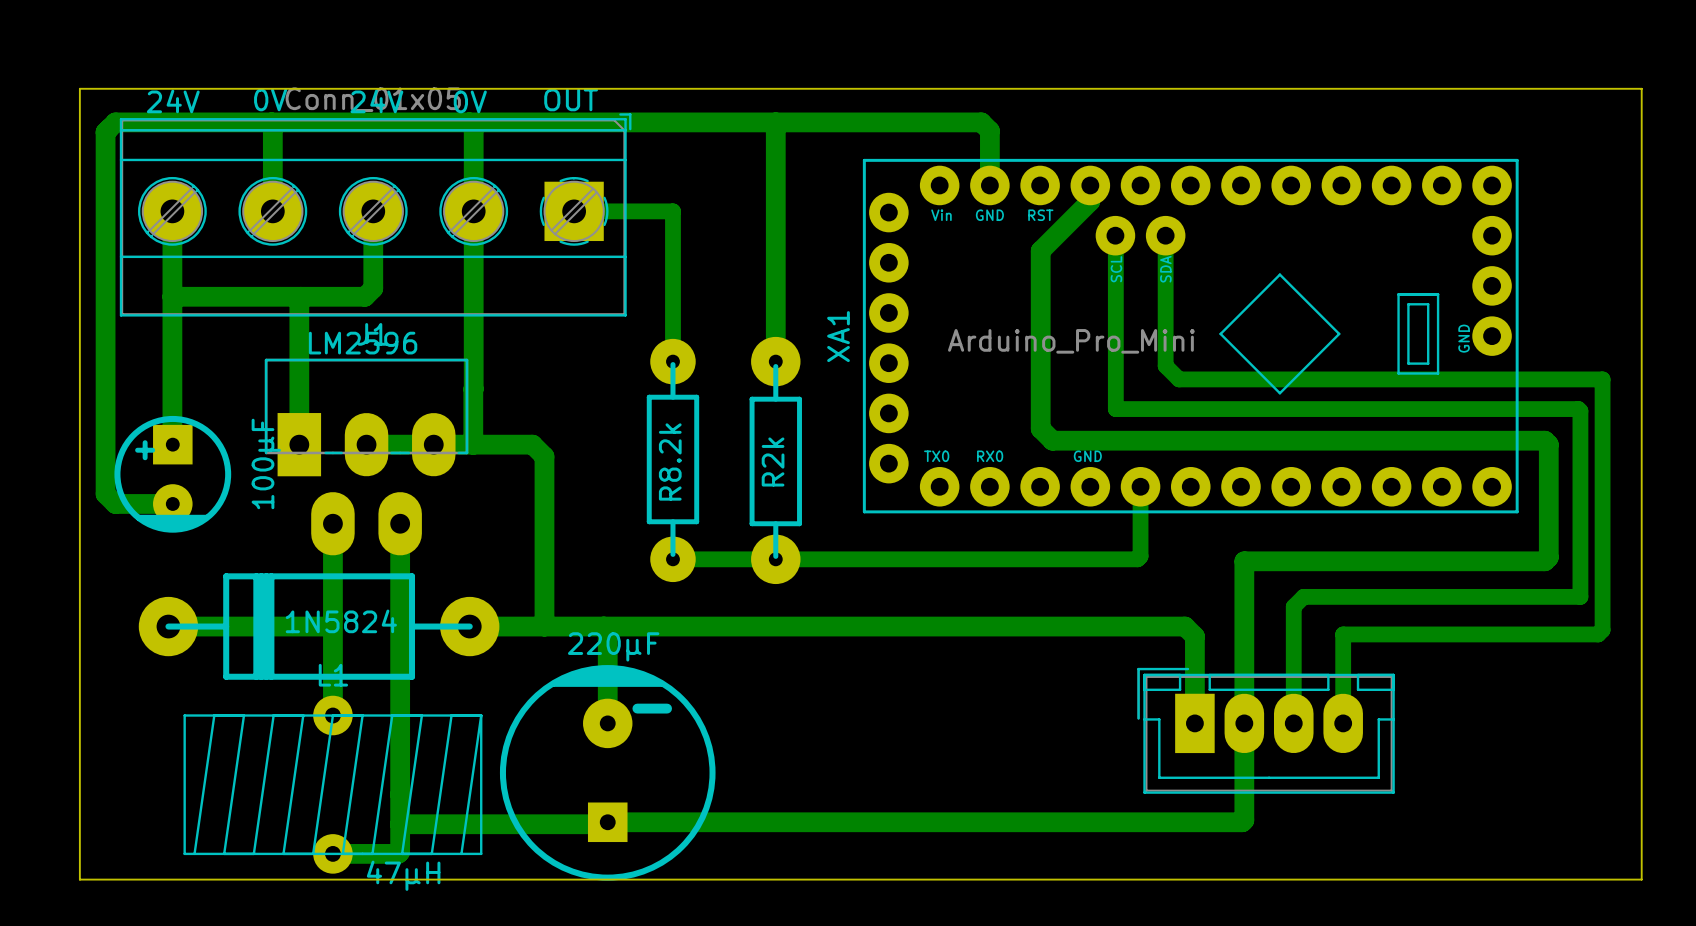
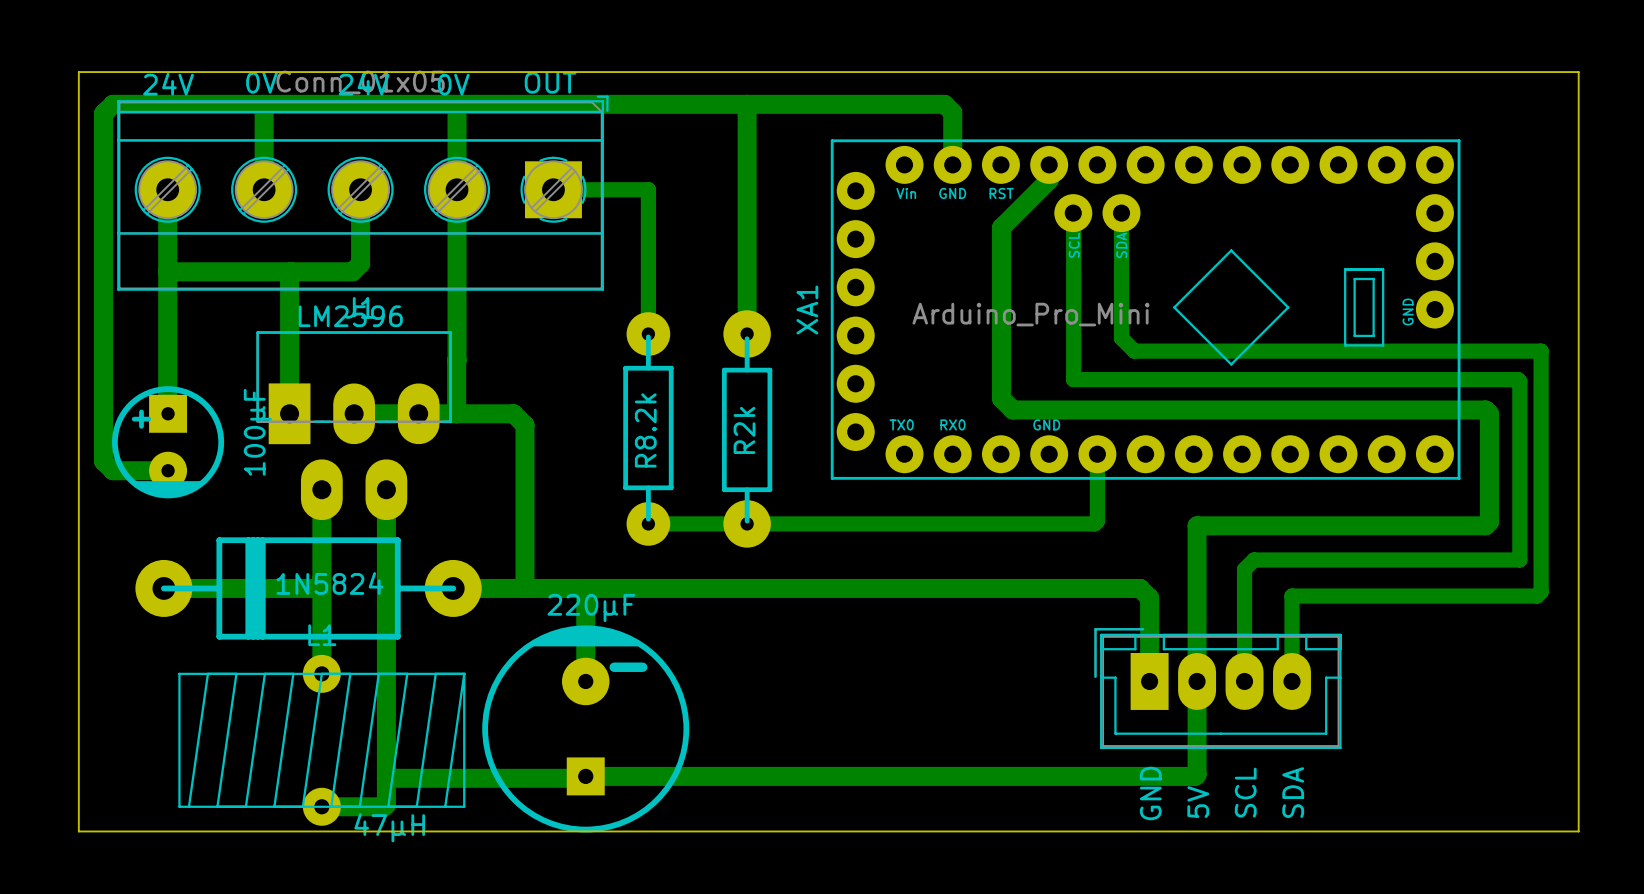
text: none -> SCL (1245, 792)
text: none -> SDA (1293, 792)
text: none -> GND (1150, 793)
text: none -> 5V (1198, 802)

